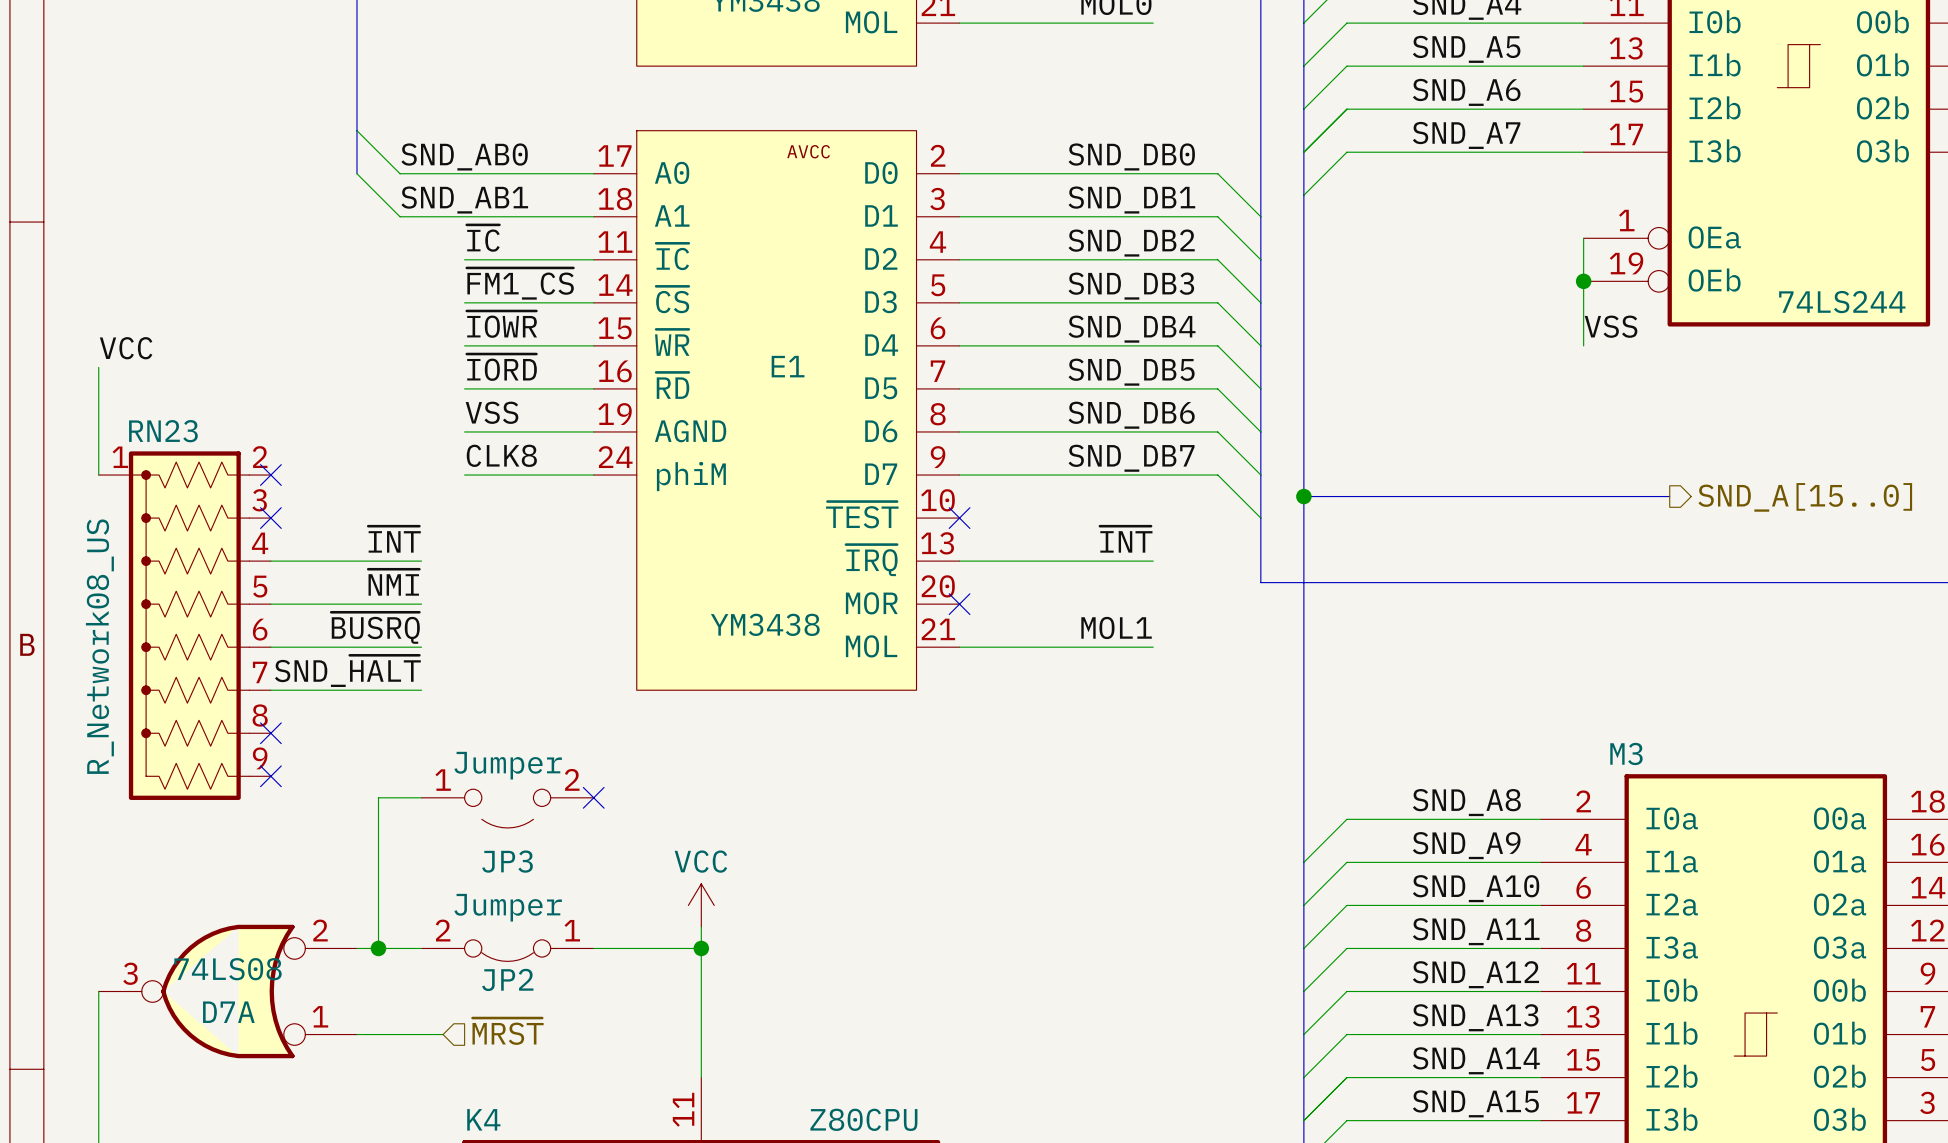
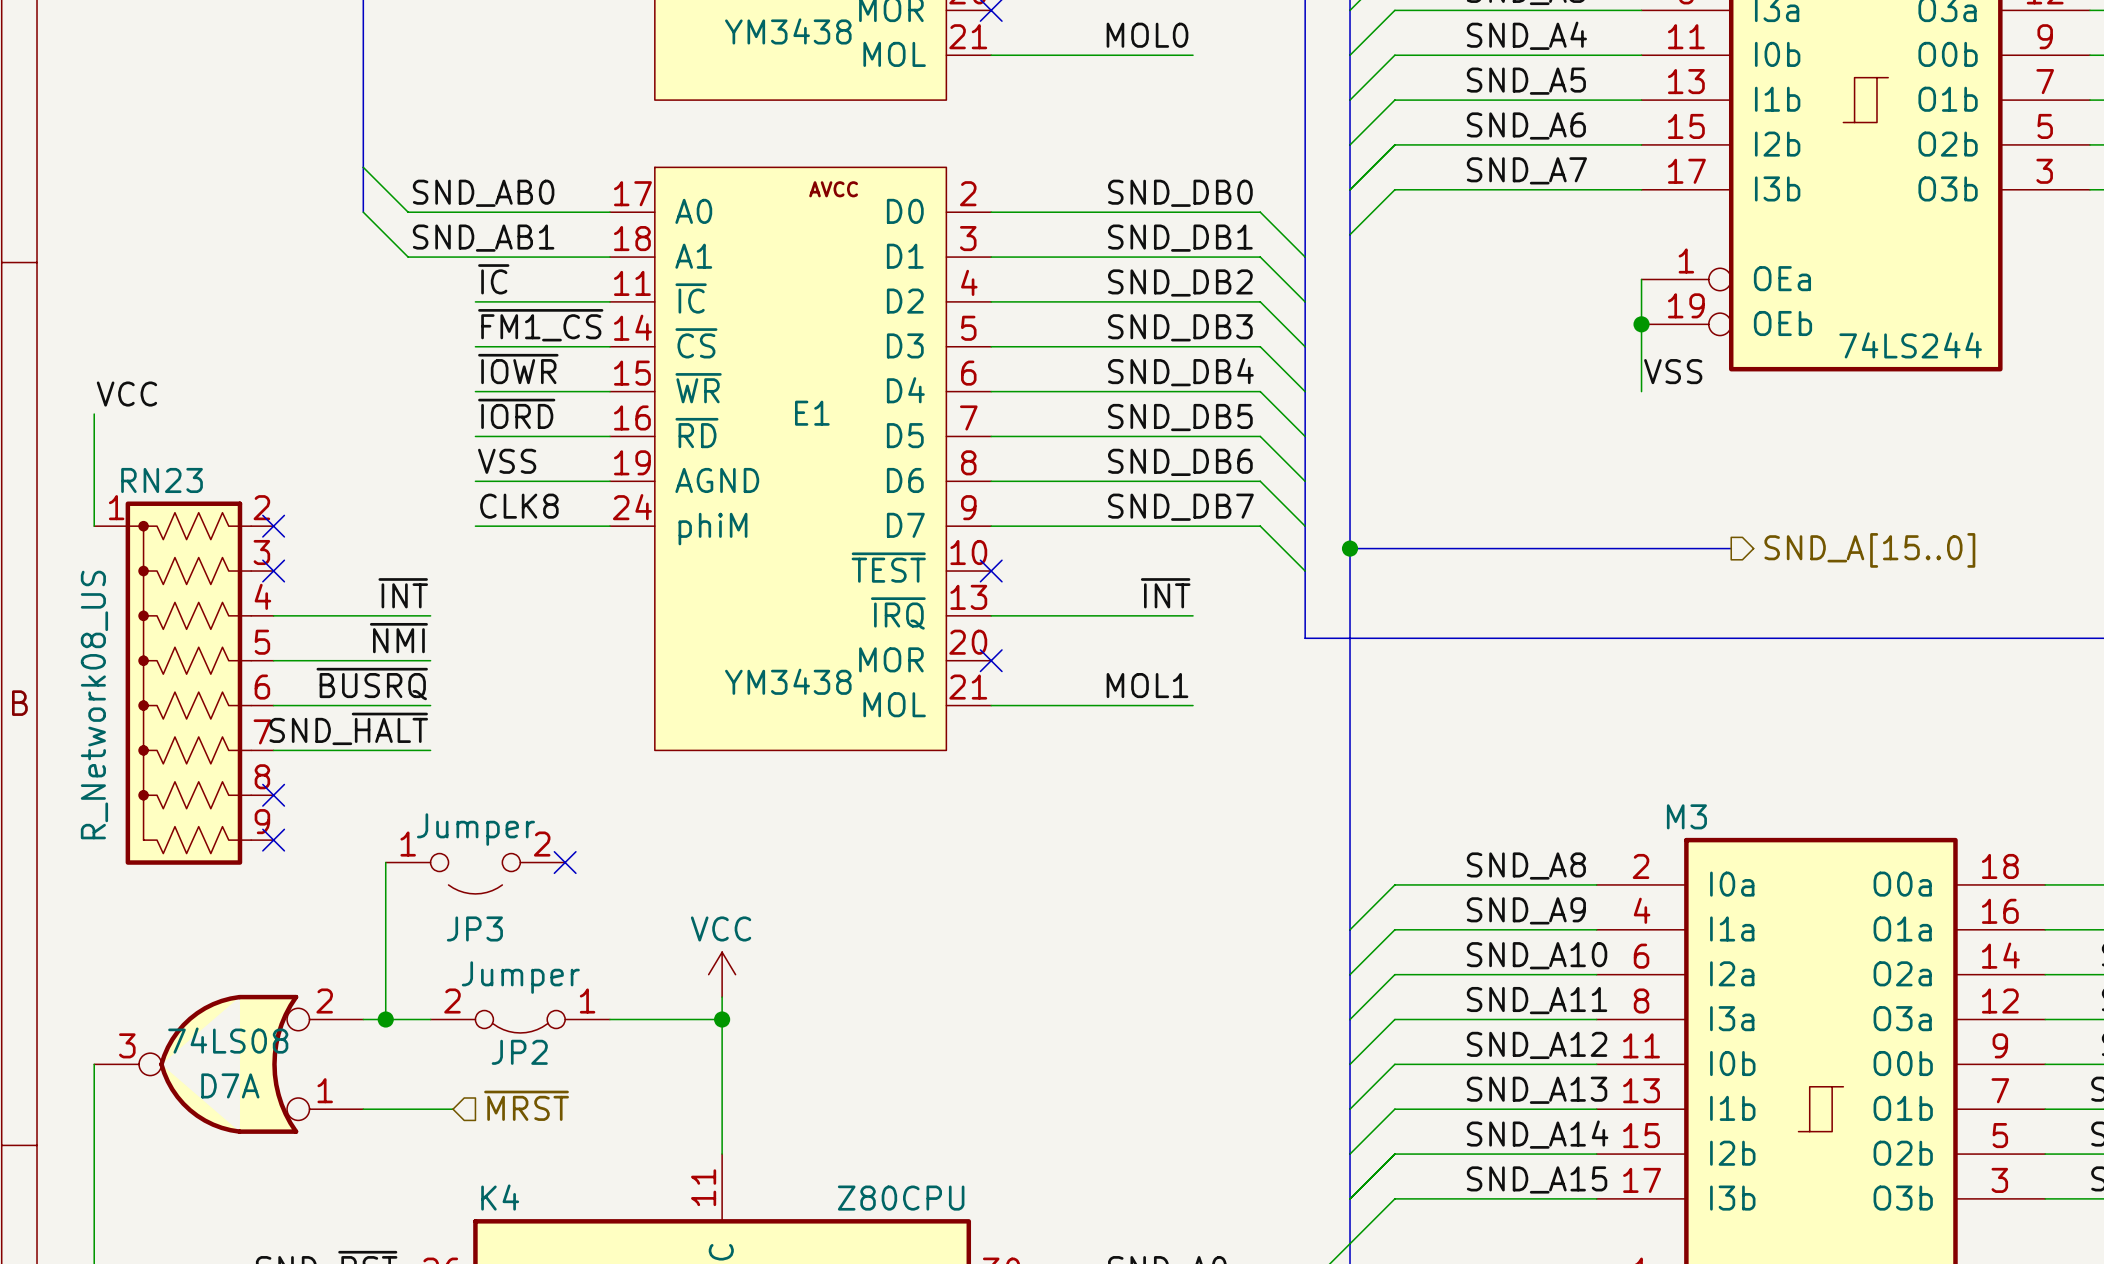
no-connect mark position: (593, 797) -> (565, 862)
JP3 position: (507, 808) -> (475, 873)

